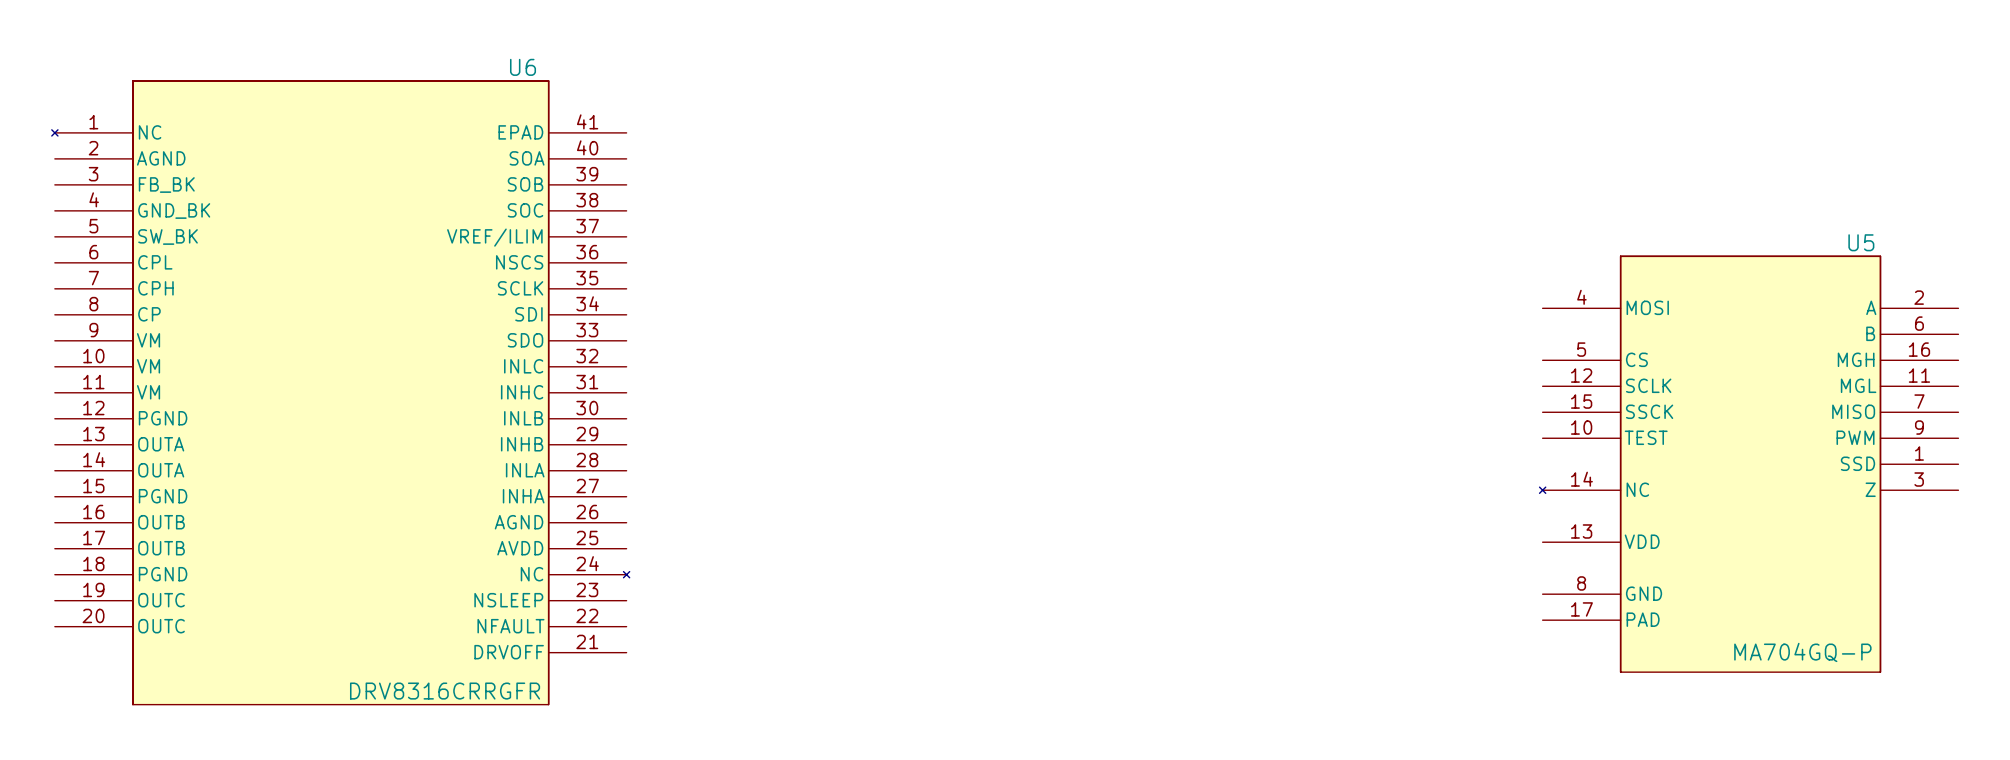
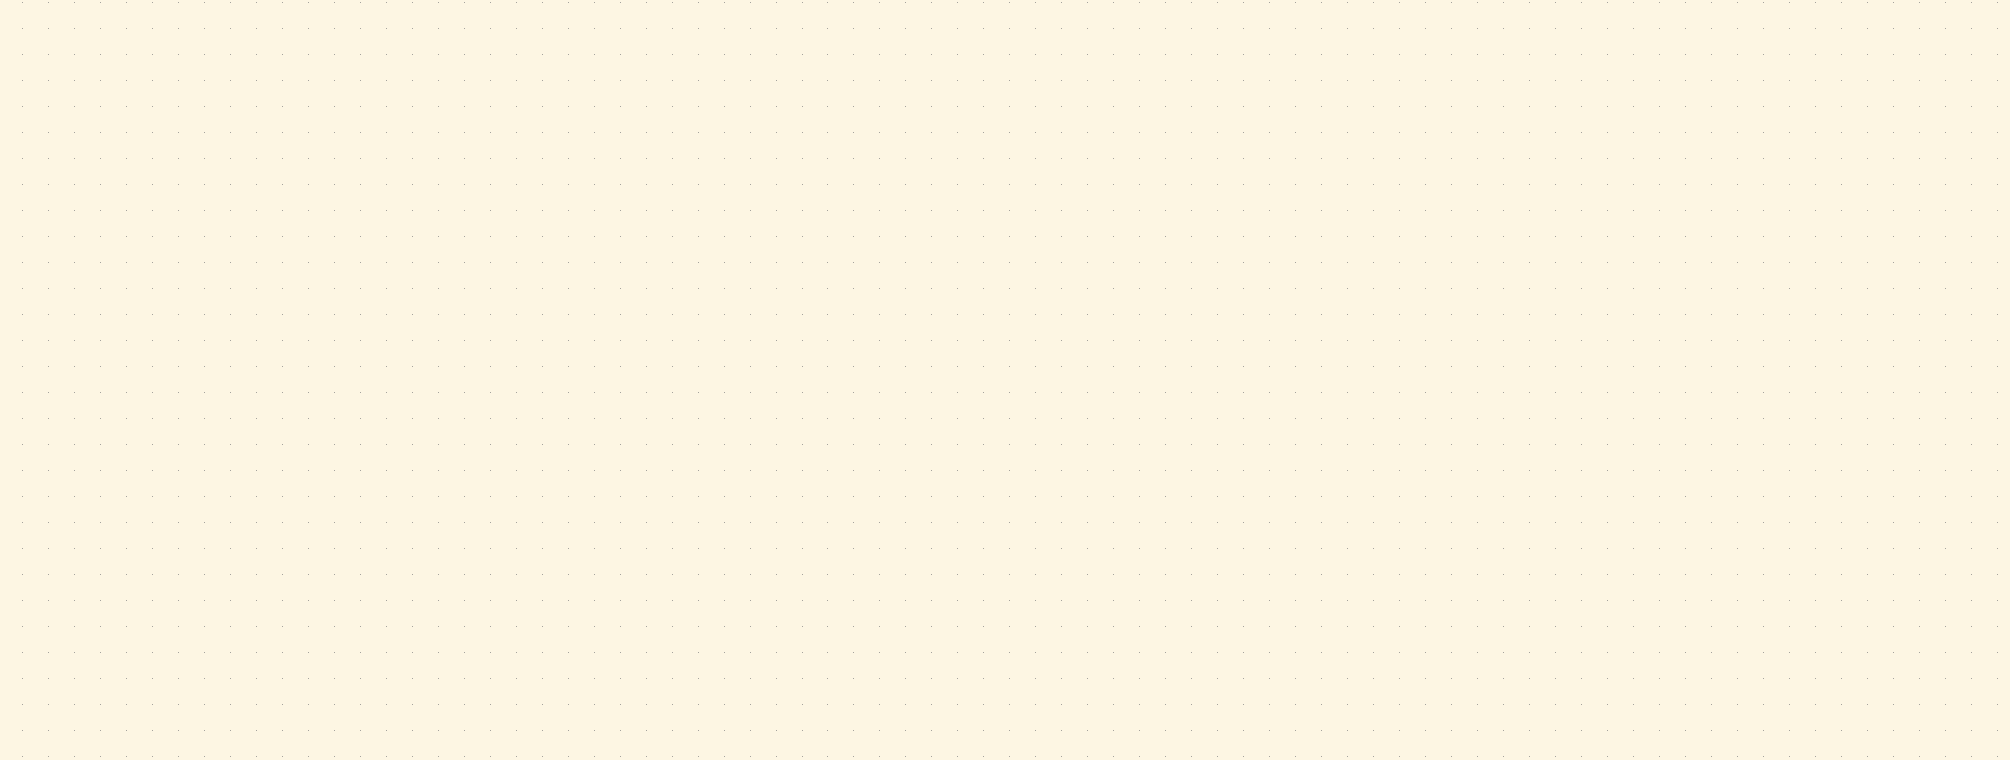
U6: DRV8316CRRGFR (340, 392) -> none
U5: MA704GQ-P (1749, 464) -> none

